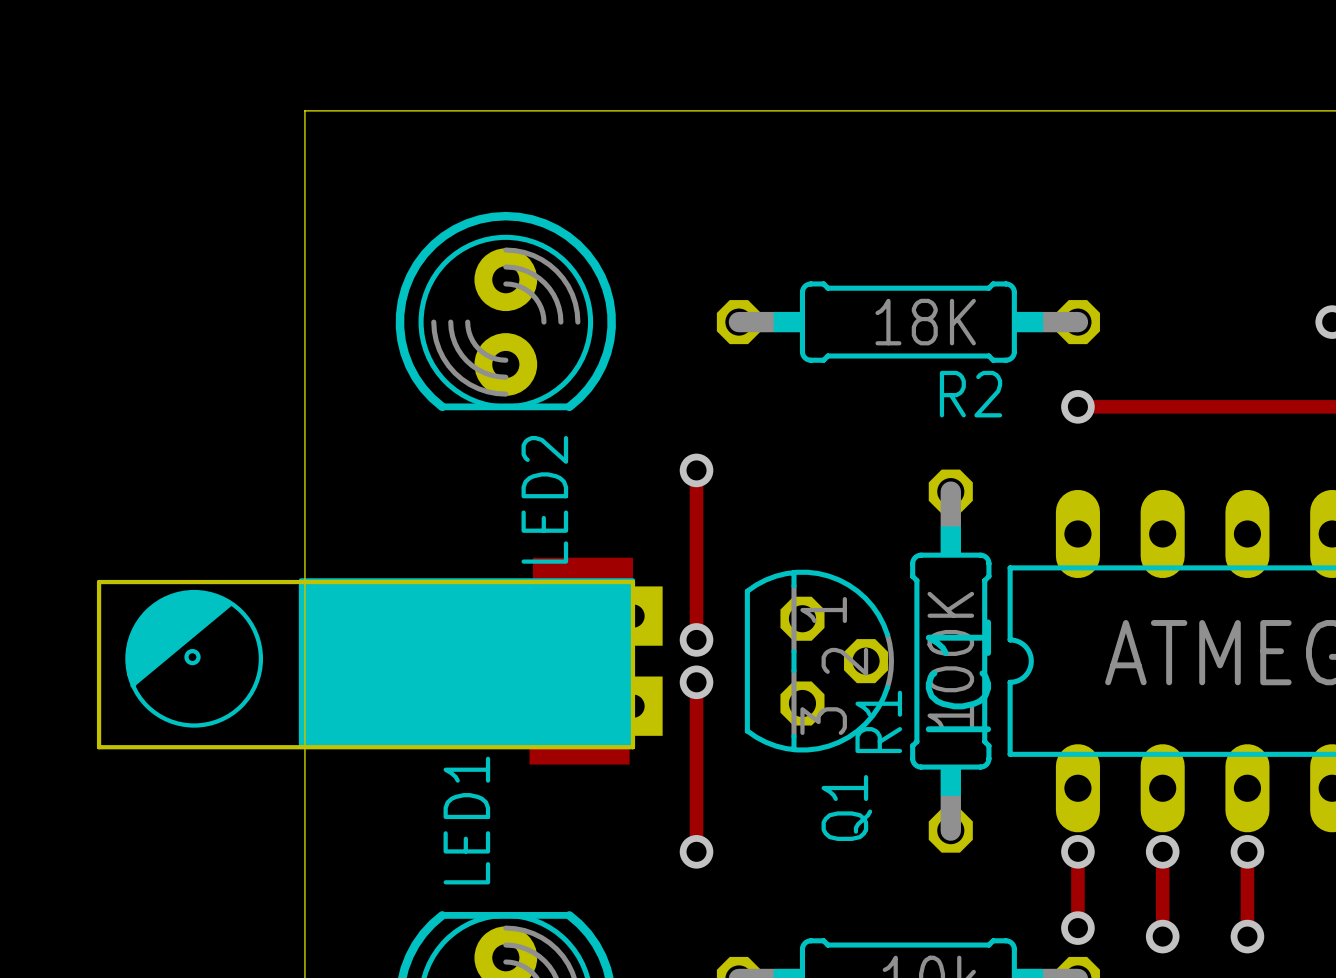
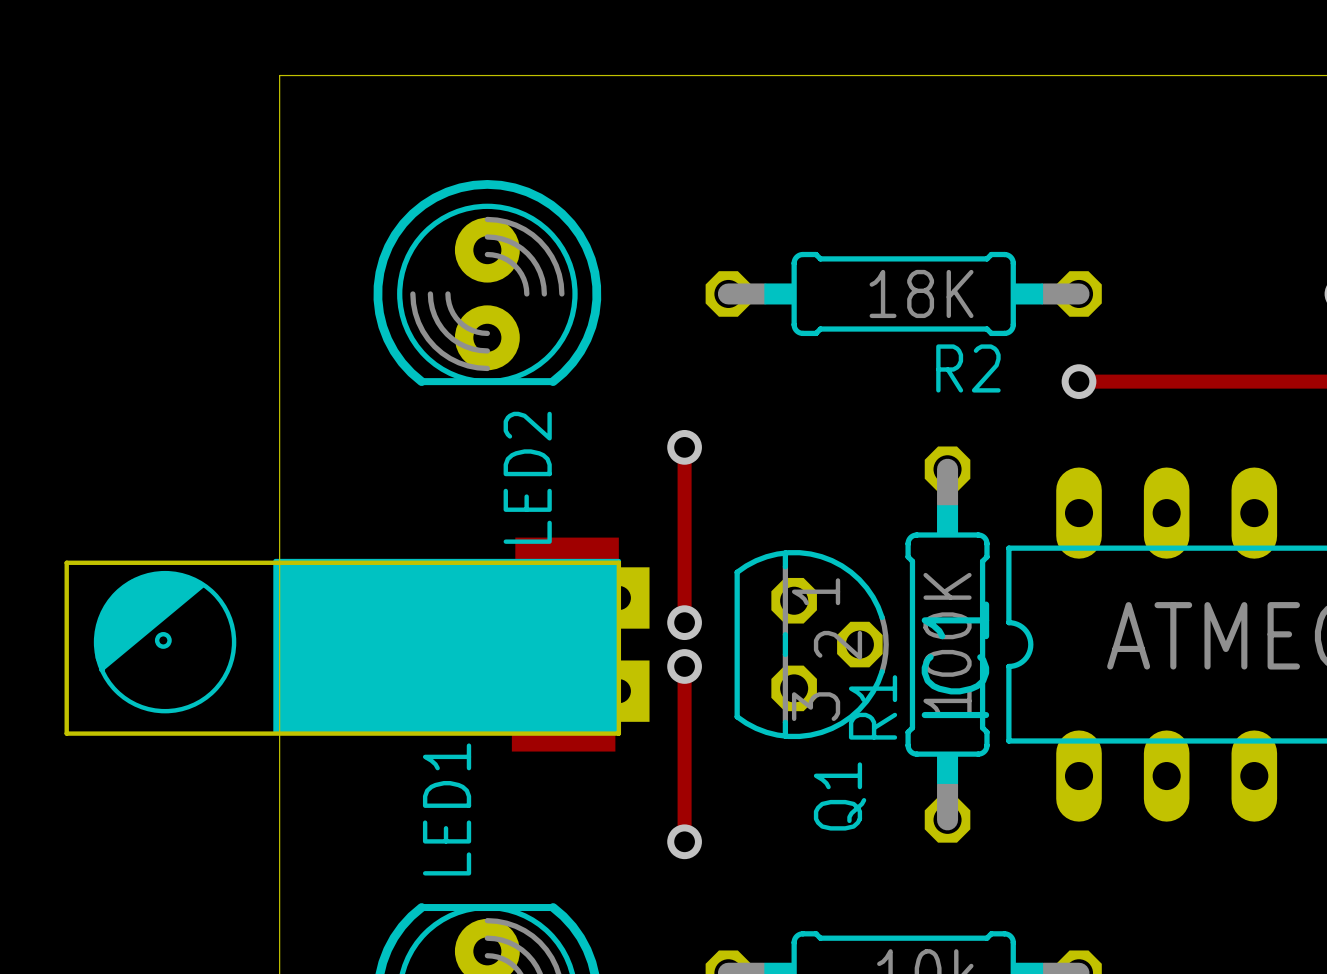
track: (1077, 851) (1077, 923) -> none
via: (1077, 851) -> none
track: (1162, 851) (1162, 936) -> none
via: (1162, 851) -> none
track: (1247, 851) (1247, 936) -> none
via: (1247, 851) -> none
via: (1077, 928) -> none
via: (1162, 936) -> none
via: (1247, 936) -> none

